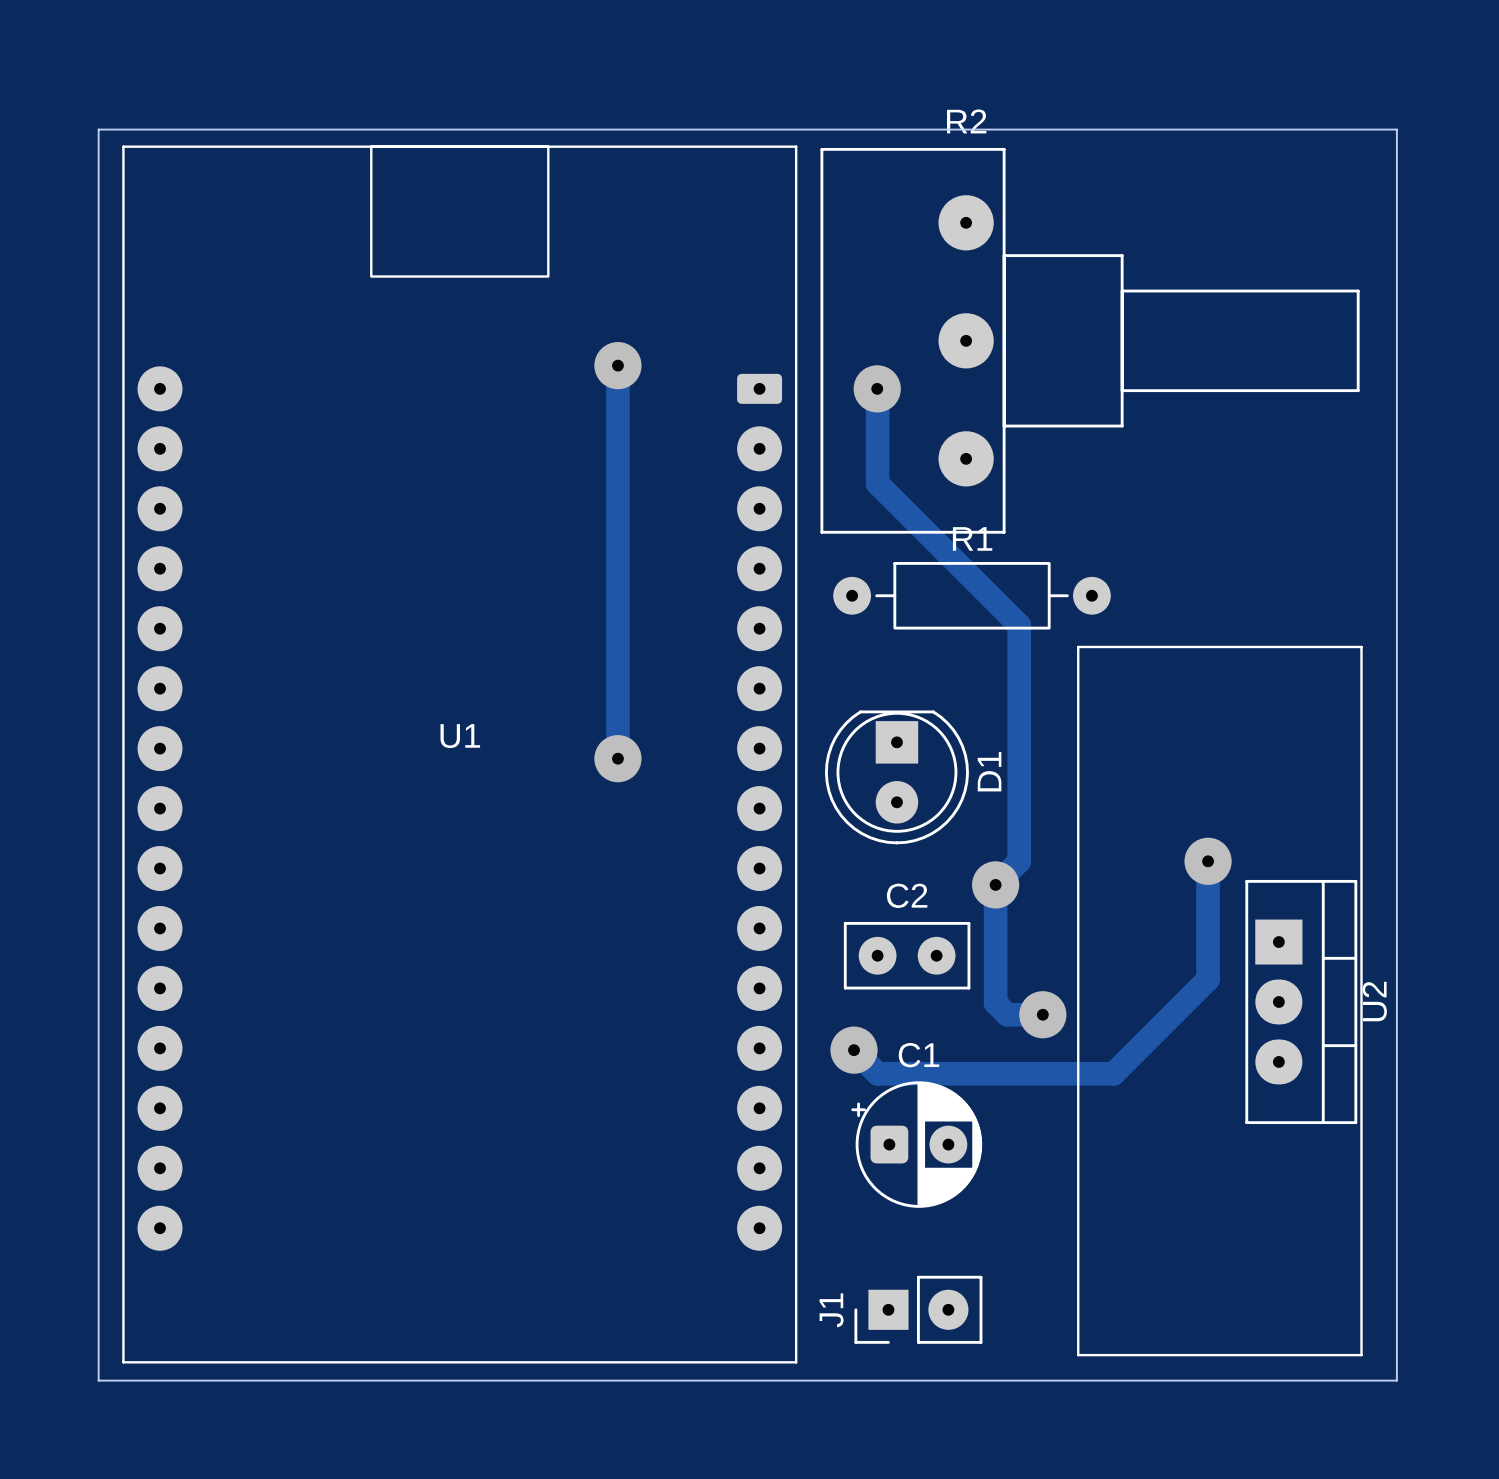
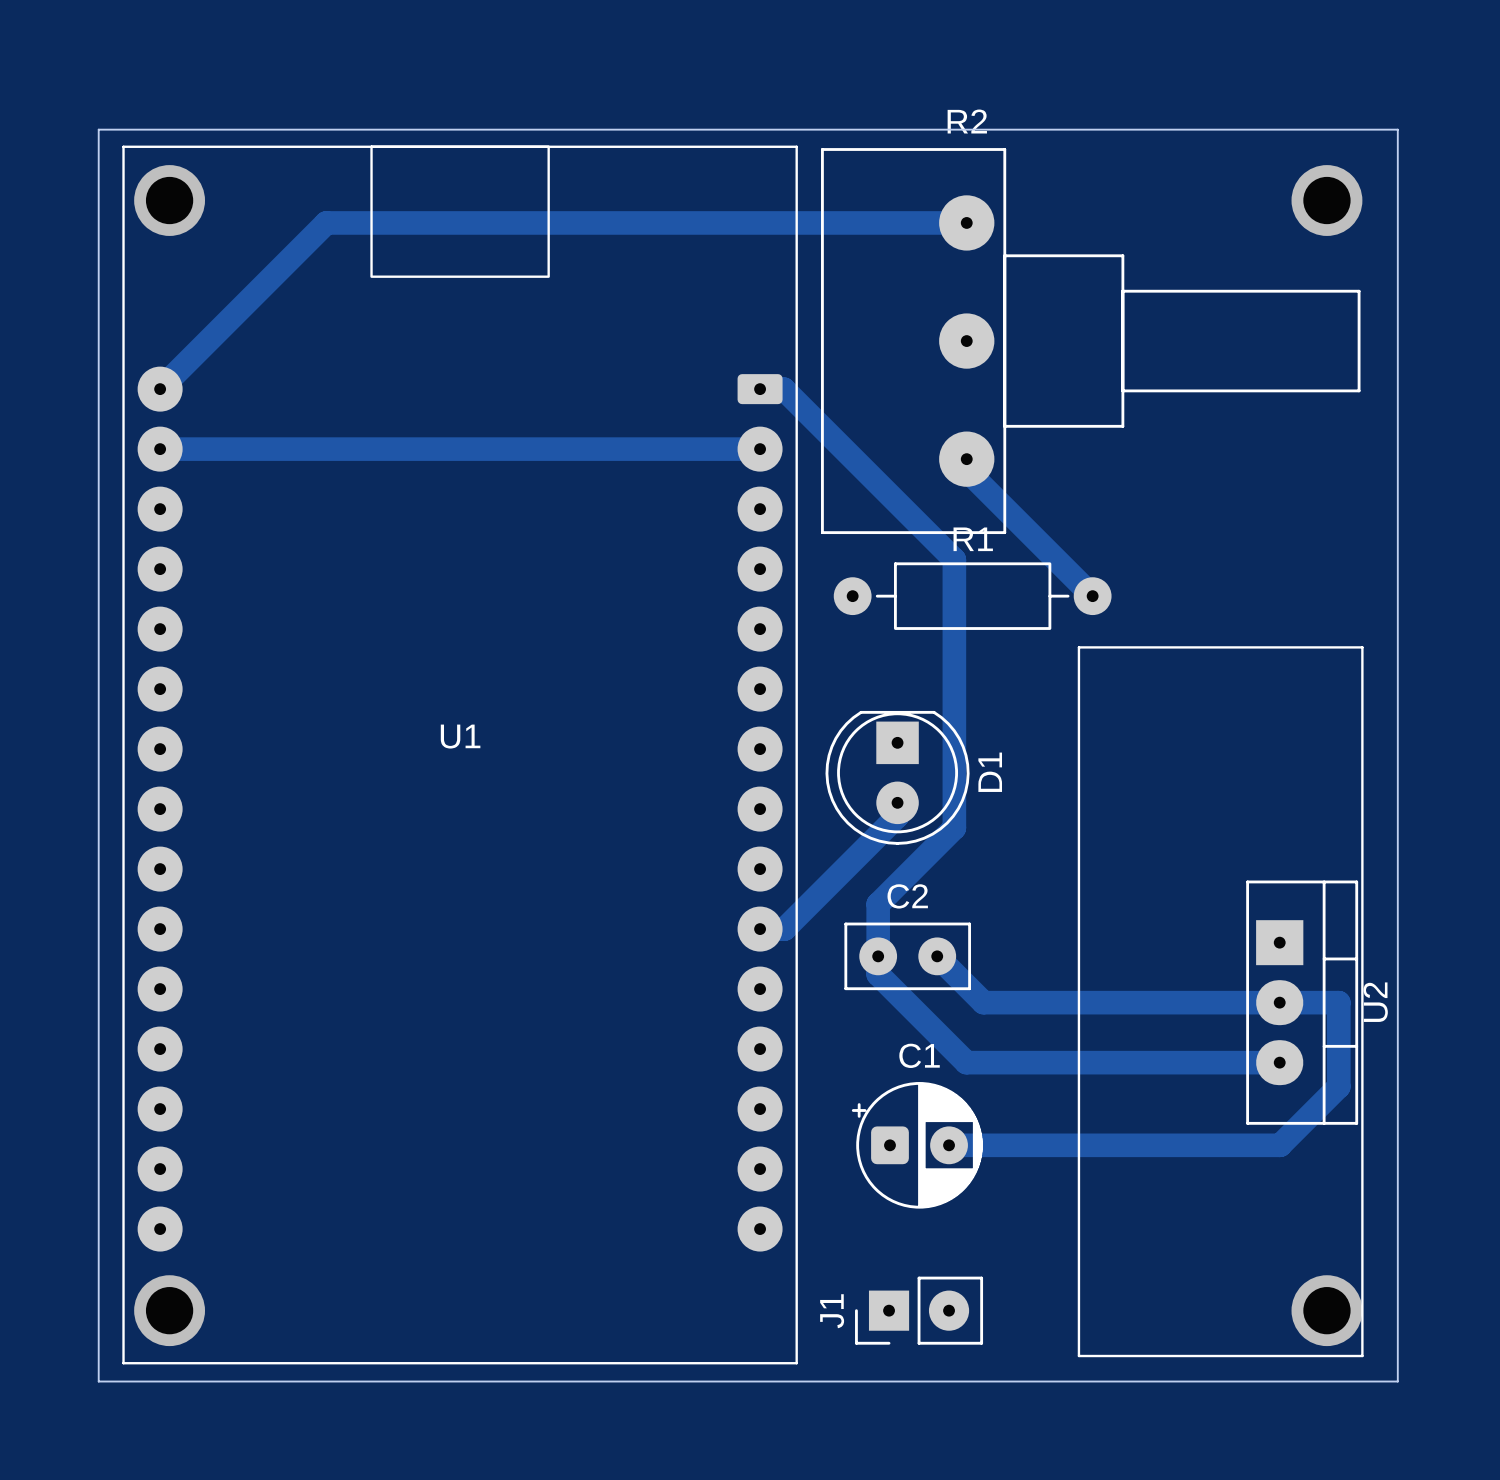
via: none -> (169, 200)
via: none -> (1326, 200)
track: none -> (966, 222) (326, 222) (160, 389)
track: (617, 365) (617, 758) -> none
via: (617, 365) -> none
track: none -> (760, 389) (783, 389) (954, 559) (954, 828) (878, 904) (878, 974) (966, 1062) (1279, 1062)
track: (877, 388) (877, 483) (1019, 625) (1019, 861) (995, 884) (995, 1002) (1007, 1014) (1042, 1014) -> none
via: (877, 388) -> none
track: none -> (160, 449) (760, 449)
track: none -> (966, 459) (966, 470) (1092, 596)
via: (617, 758) -> none
track: none -> (897, 802) (897, 816) (784, 929) (760, 929)
track: (1208, 861) (1208, 979) (1113, 1073) (877, 1073) (853, 1050) -> none
via: (1208, 861) -> none
via: (995, 884) -> none
track: none -> (937, 956) (983, 1002) (1338, 1002) (1338, 1086) (1280, 1145) (949, 1145)
via: (1042, 1014) -> none
via: (853, 1050) -> none
via: none -> (169, 1310)
via: none -> (1326, 1310)

